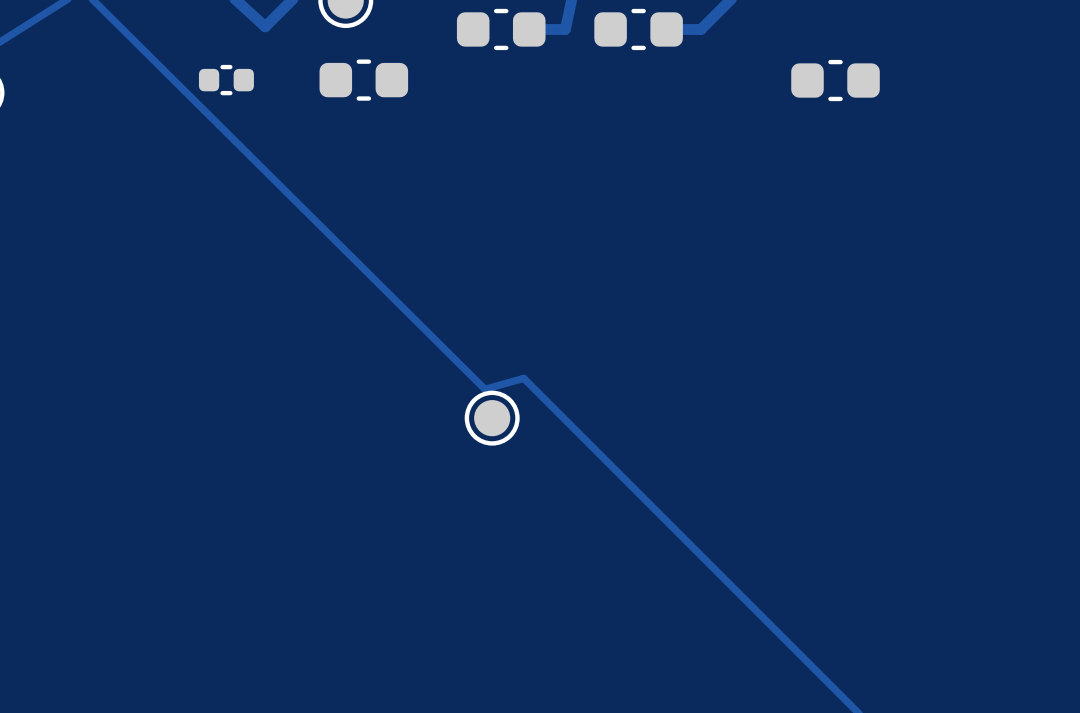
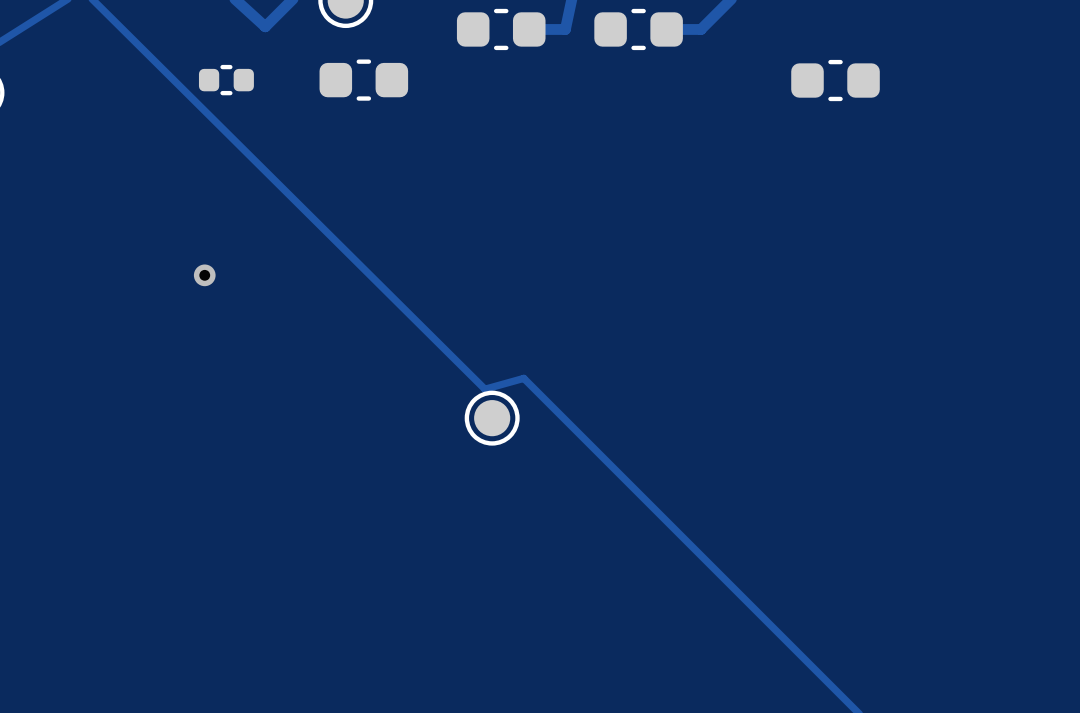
via: none -> (204, 275)

